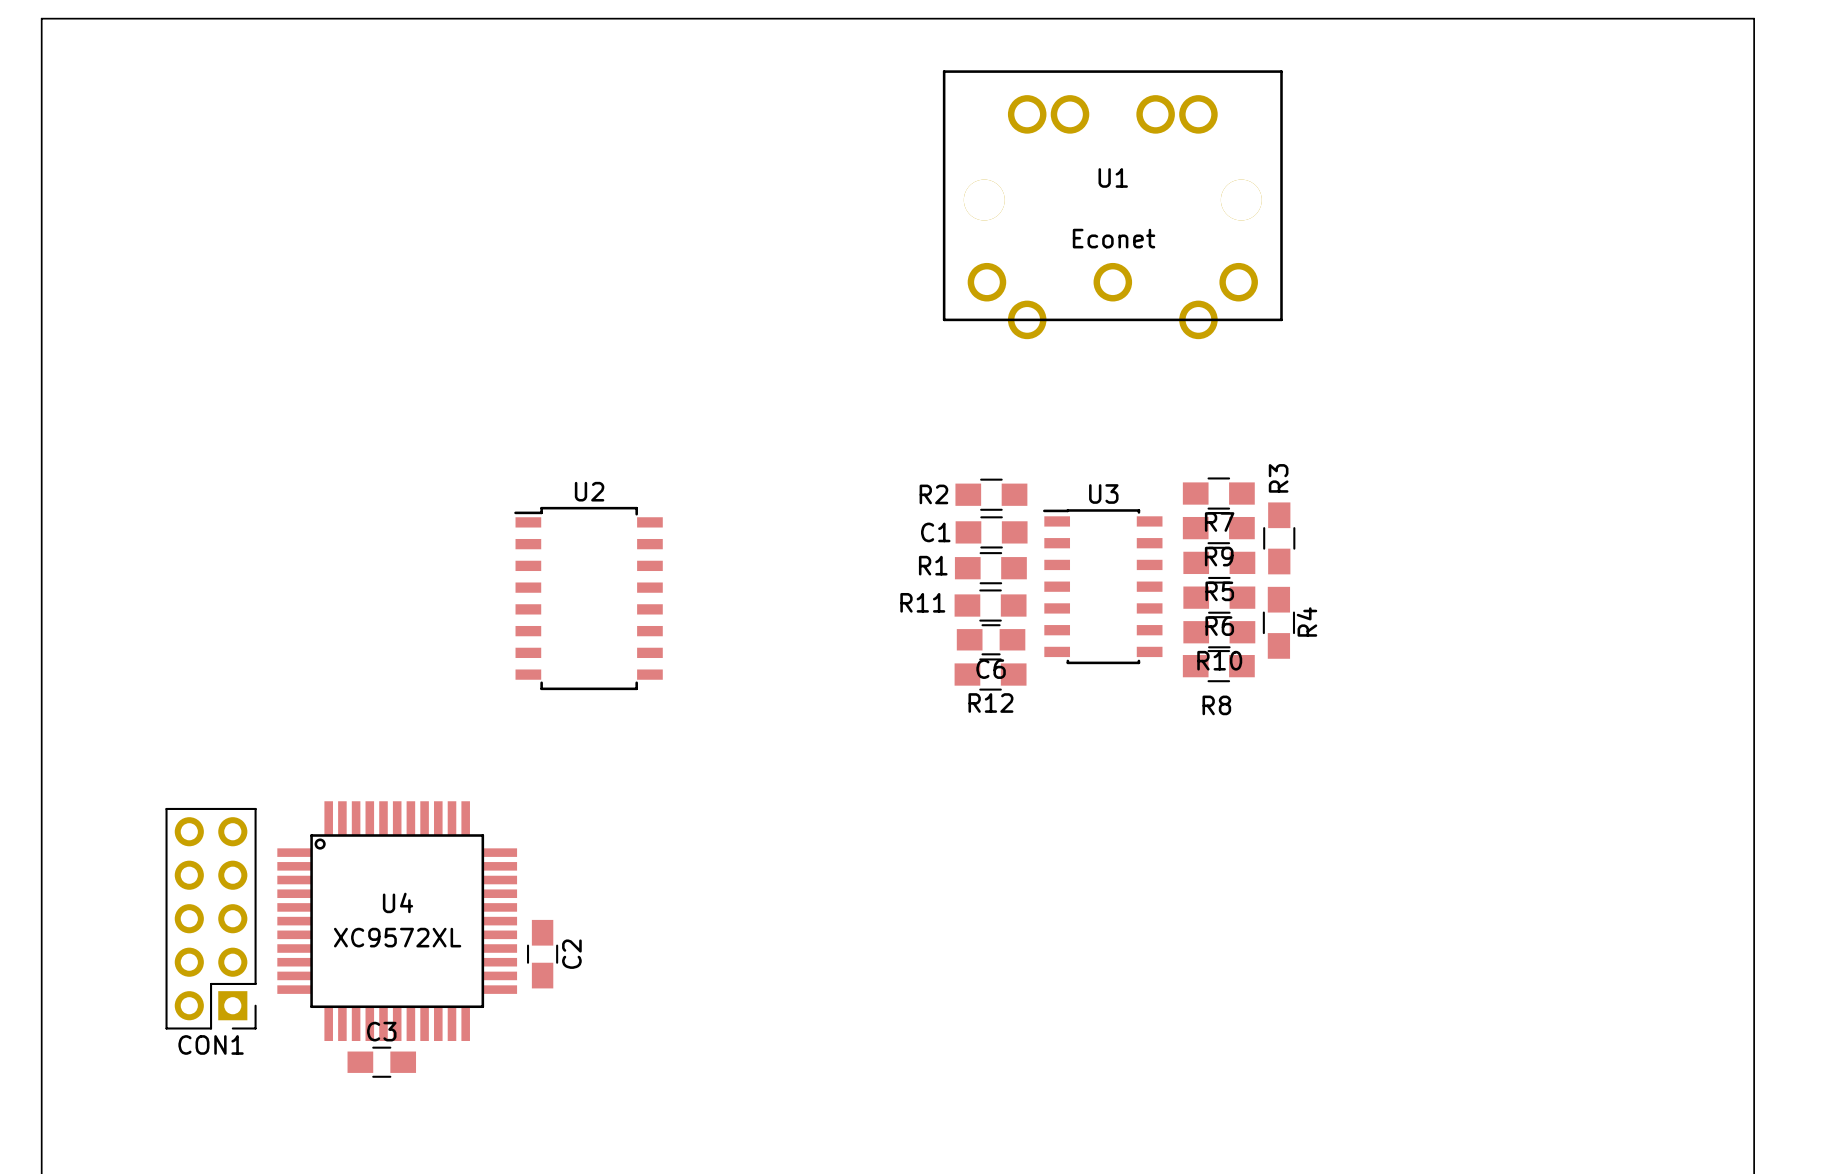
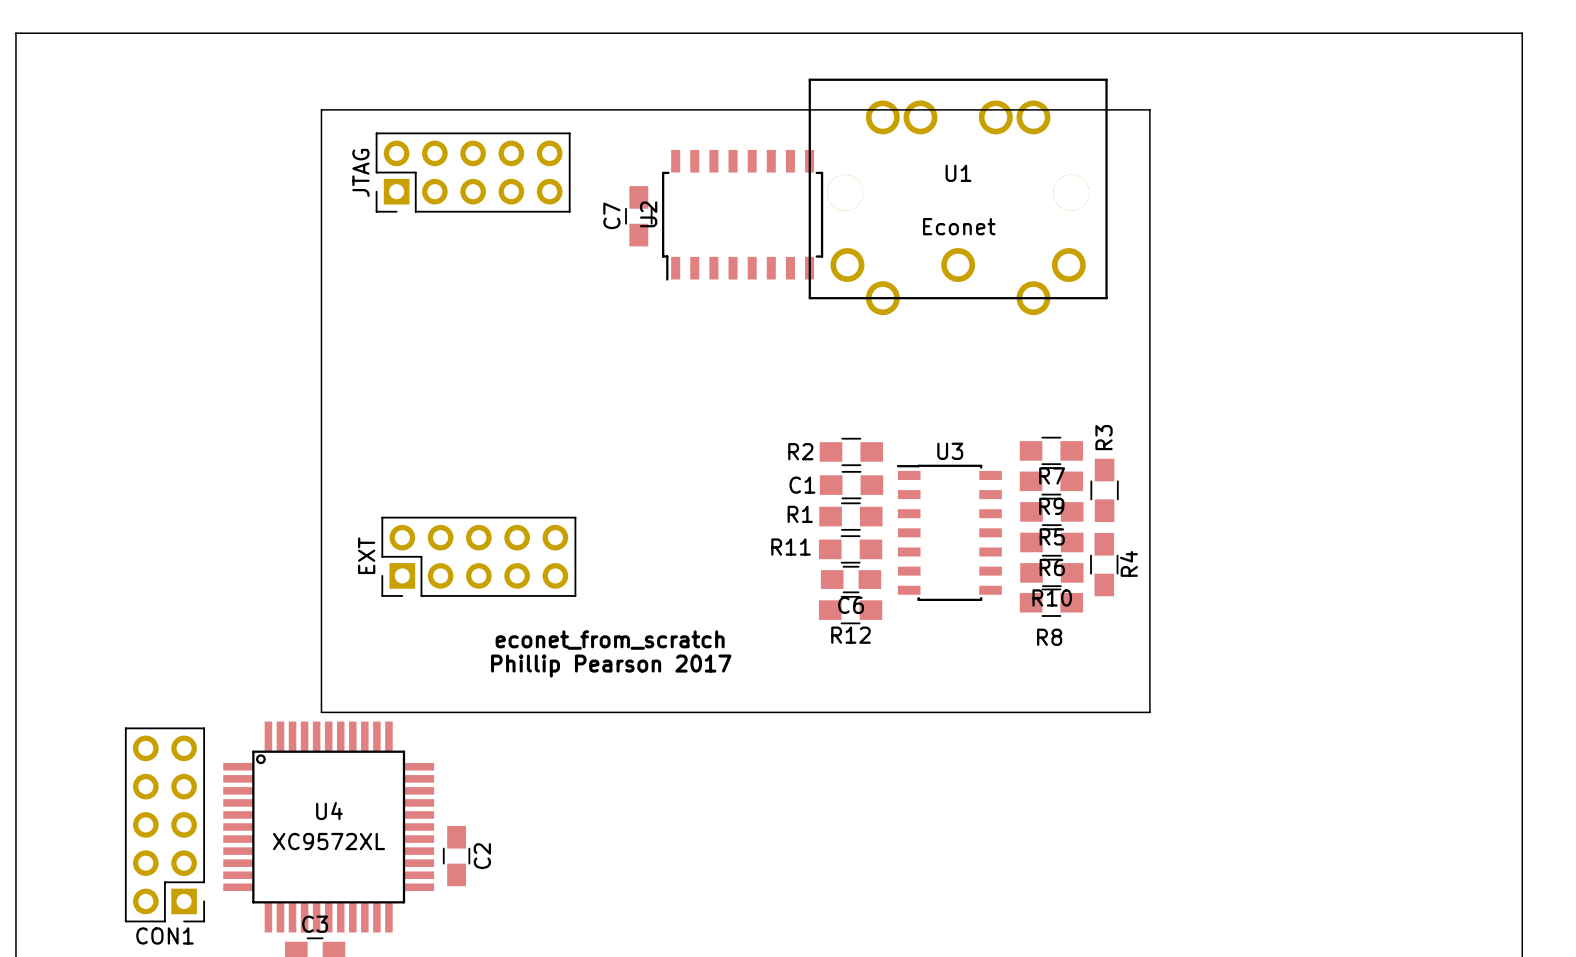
board edge: none -> (321, 109) (321, 712) (1149, 712) (1149, 109) (321, 109)
JTAG: none -> (473, 172)
C7: none -> (638, 216)
U2 rotation: 0° (588, 598) -> 90° counterclockwise (742, 215)
U2 position: (588, 598) -> (742, 215)
EXT: none -> (478, 556)
text: none -> econet_from_scratch (610, 640)
text: none -> Phillip Pearson 2017 (611, 666)

